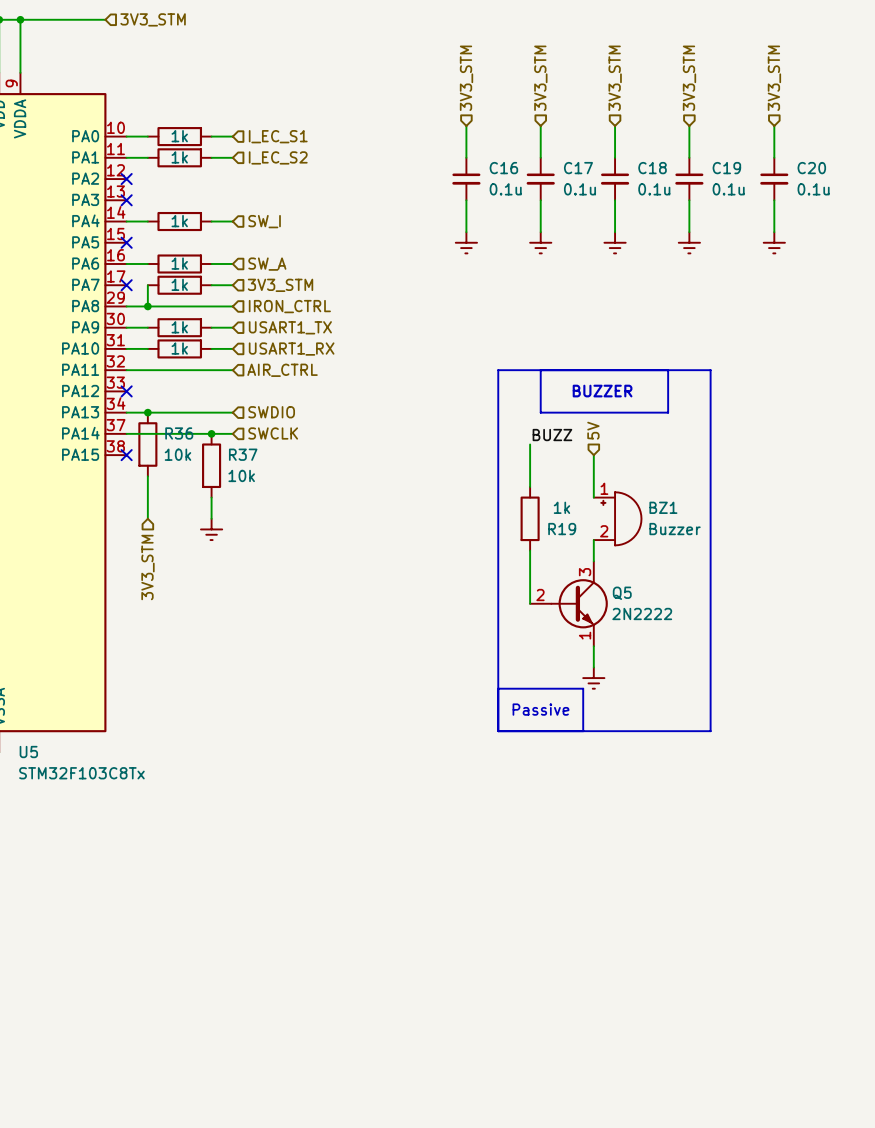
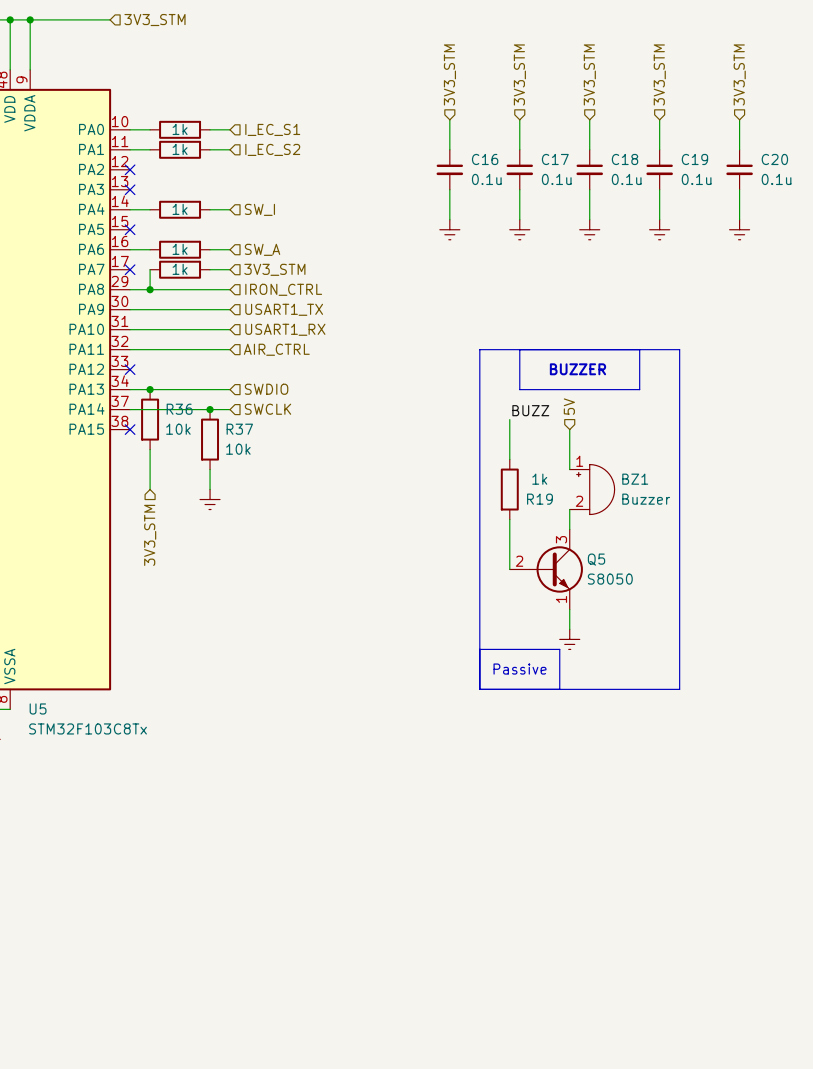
wire: none -> (150, 309) (210, 309)
part: 1k (179, 327) -> none
wire: none -> (150, 329) (210, 329)
part: 1k (179, 348) -> none
Q5 value: 2N2222 (642, 613) -> S8050 (610, 579)

